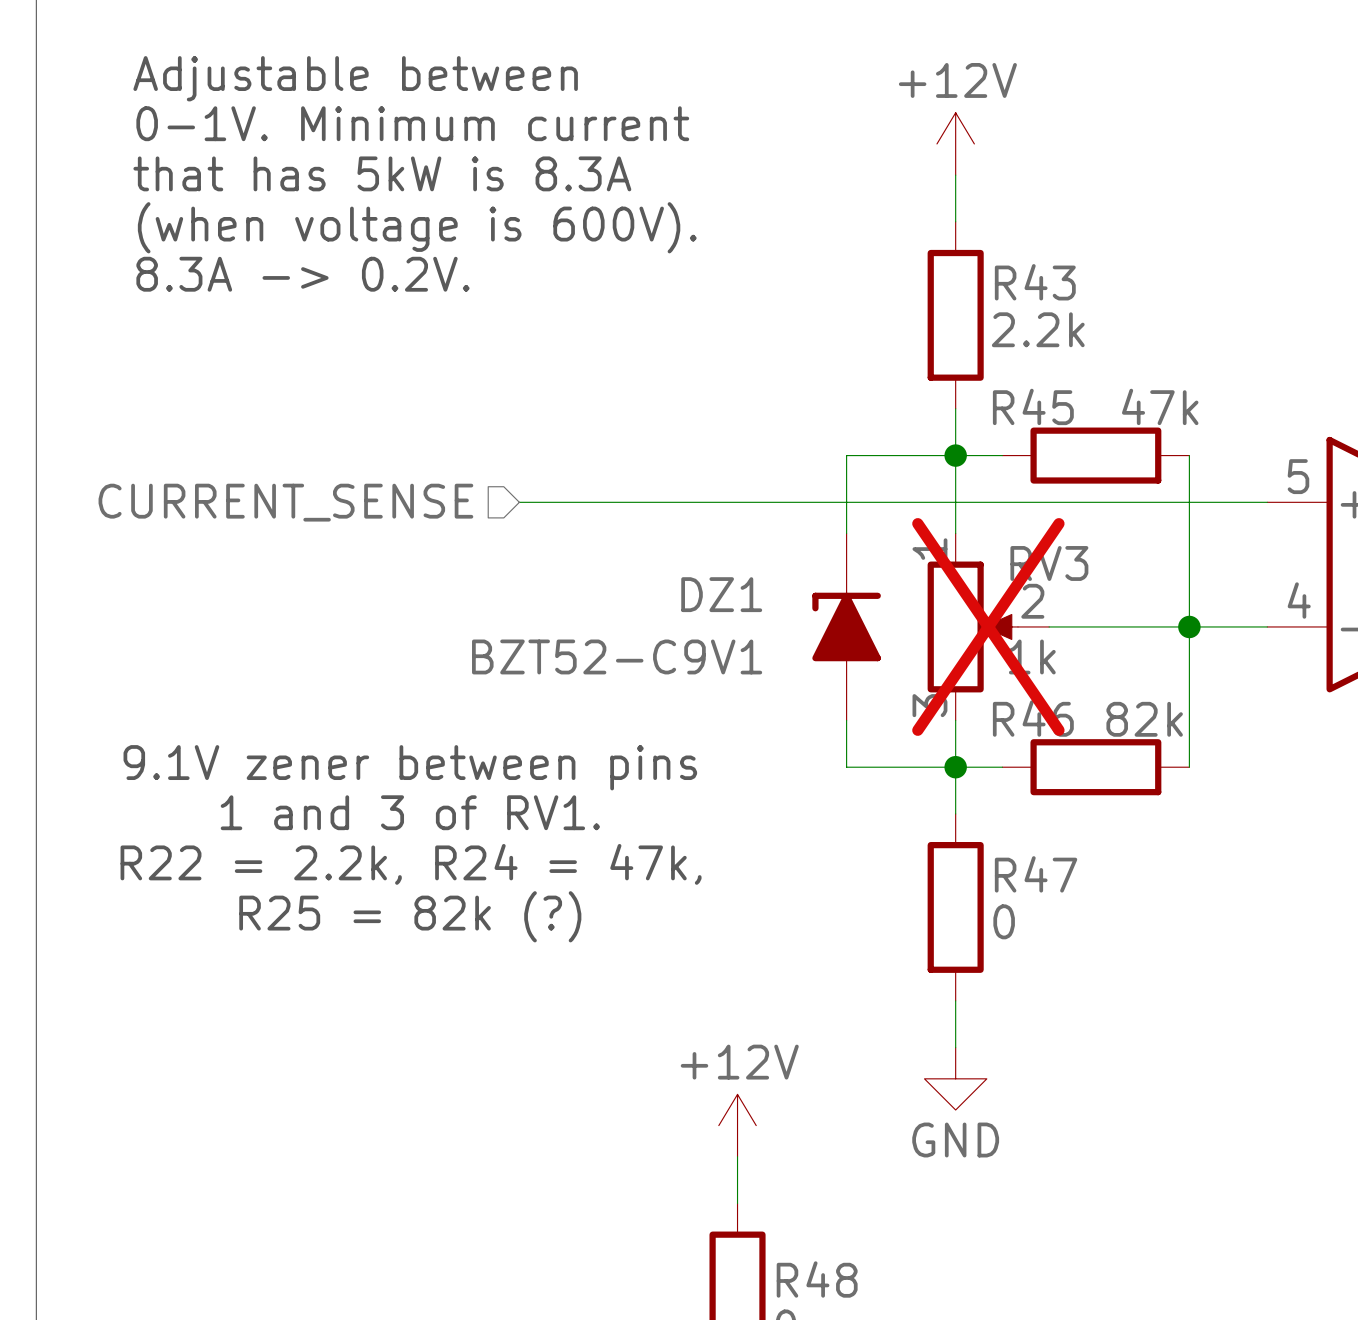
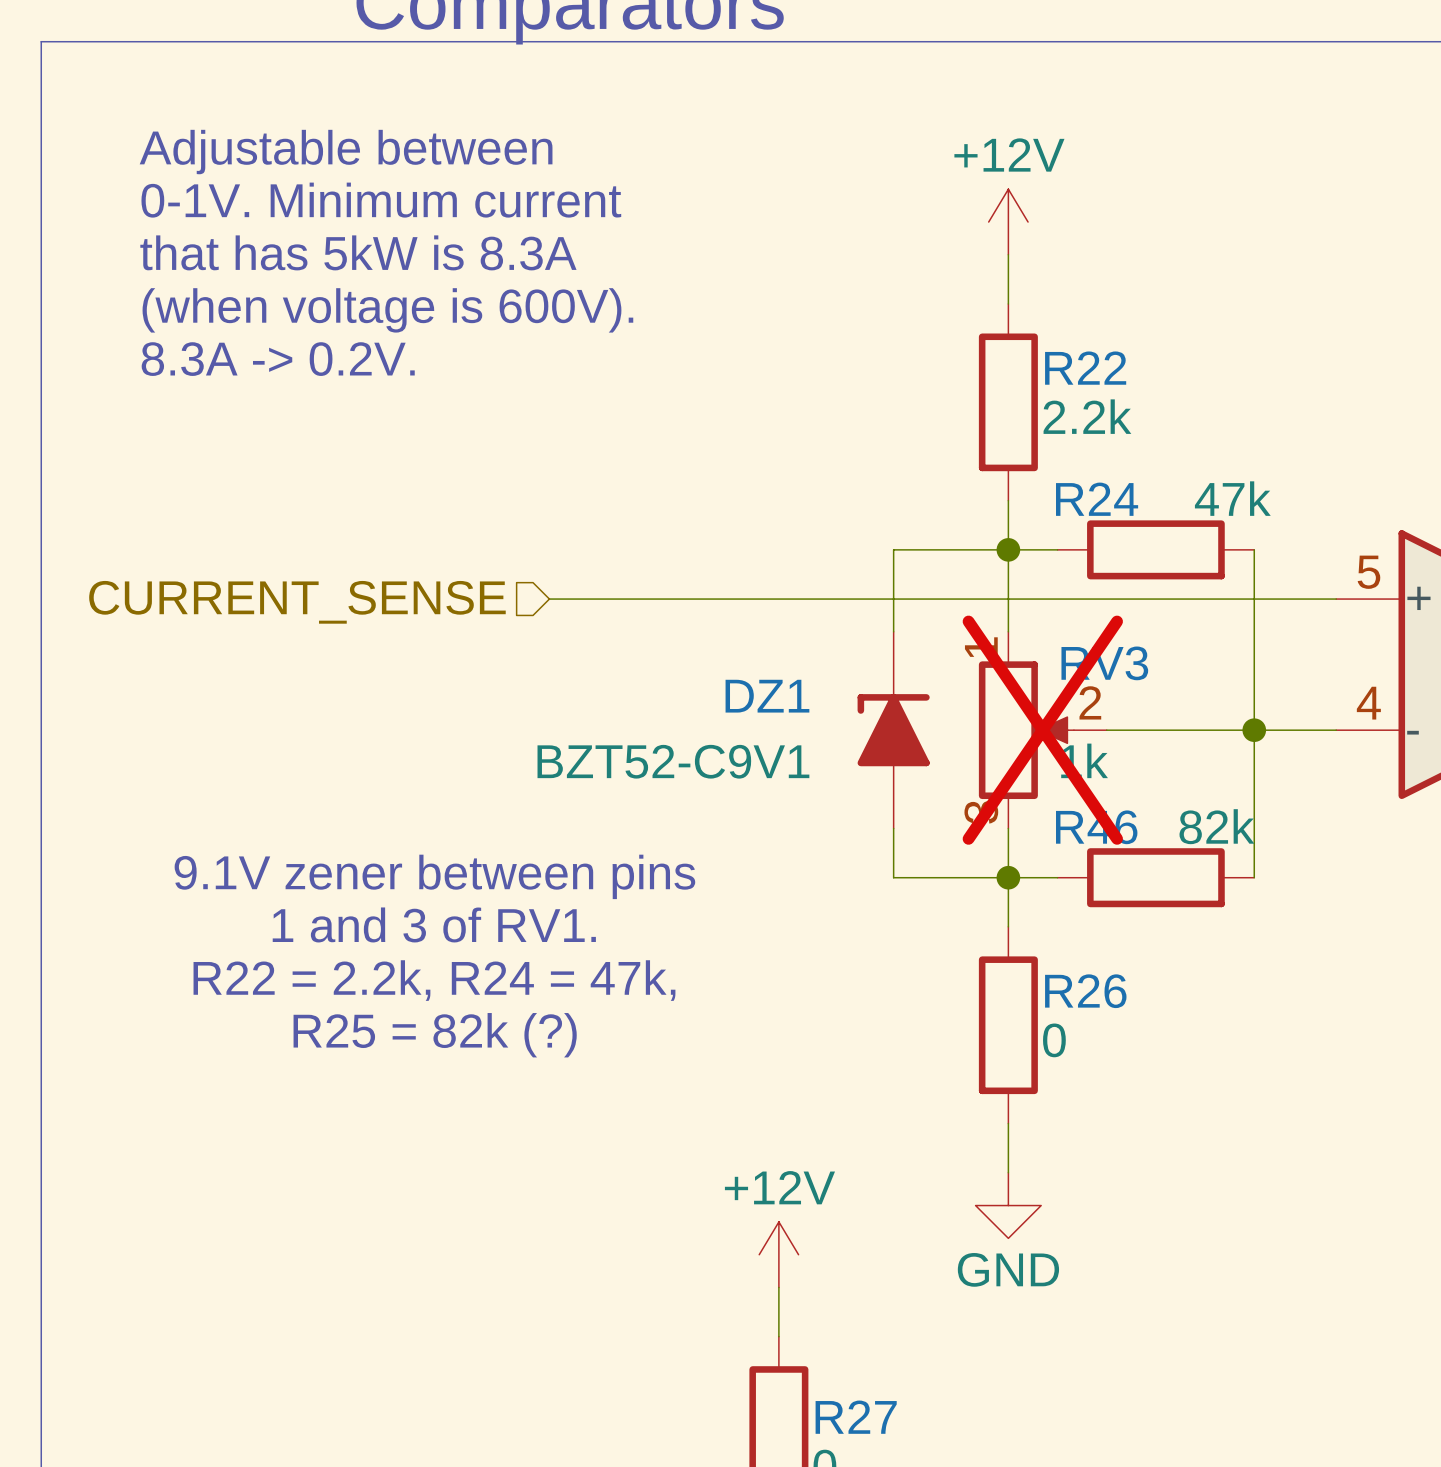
R43 name: R43 (1035, 282) -> R22 (1085, 368)
R45 name: R45 (1033, 406) -> R24 (1097, 499)
R47 name: R47 (1036, 874) -> R26 (1085, 991)
R48 name: R48 (817, 1279) -> R27 (856, 1417)

